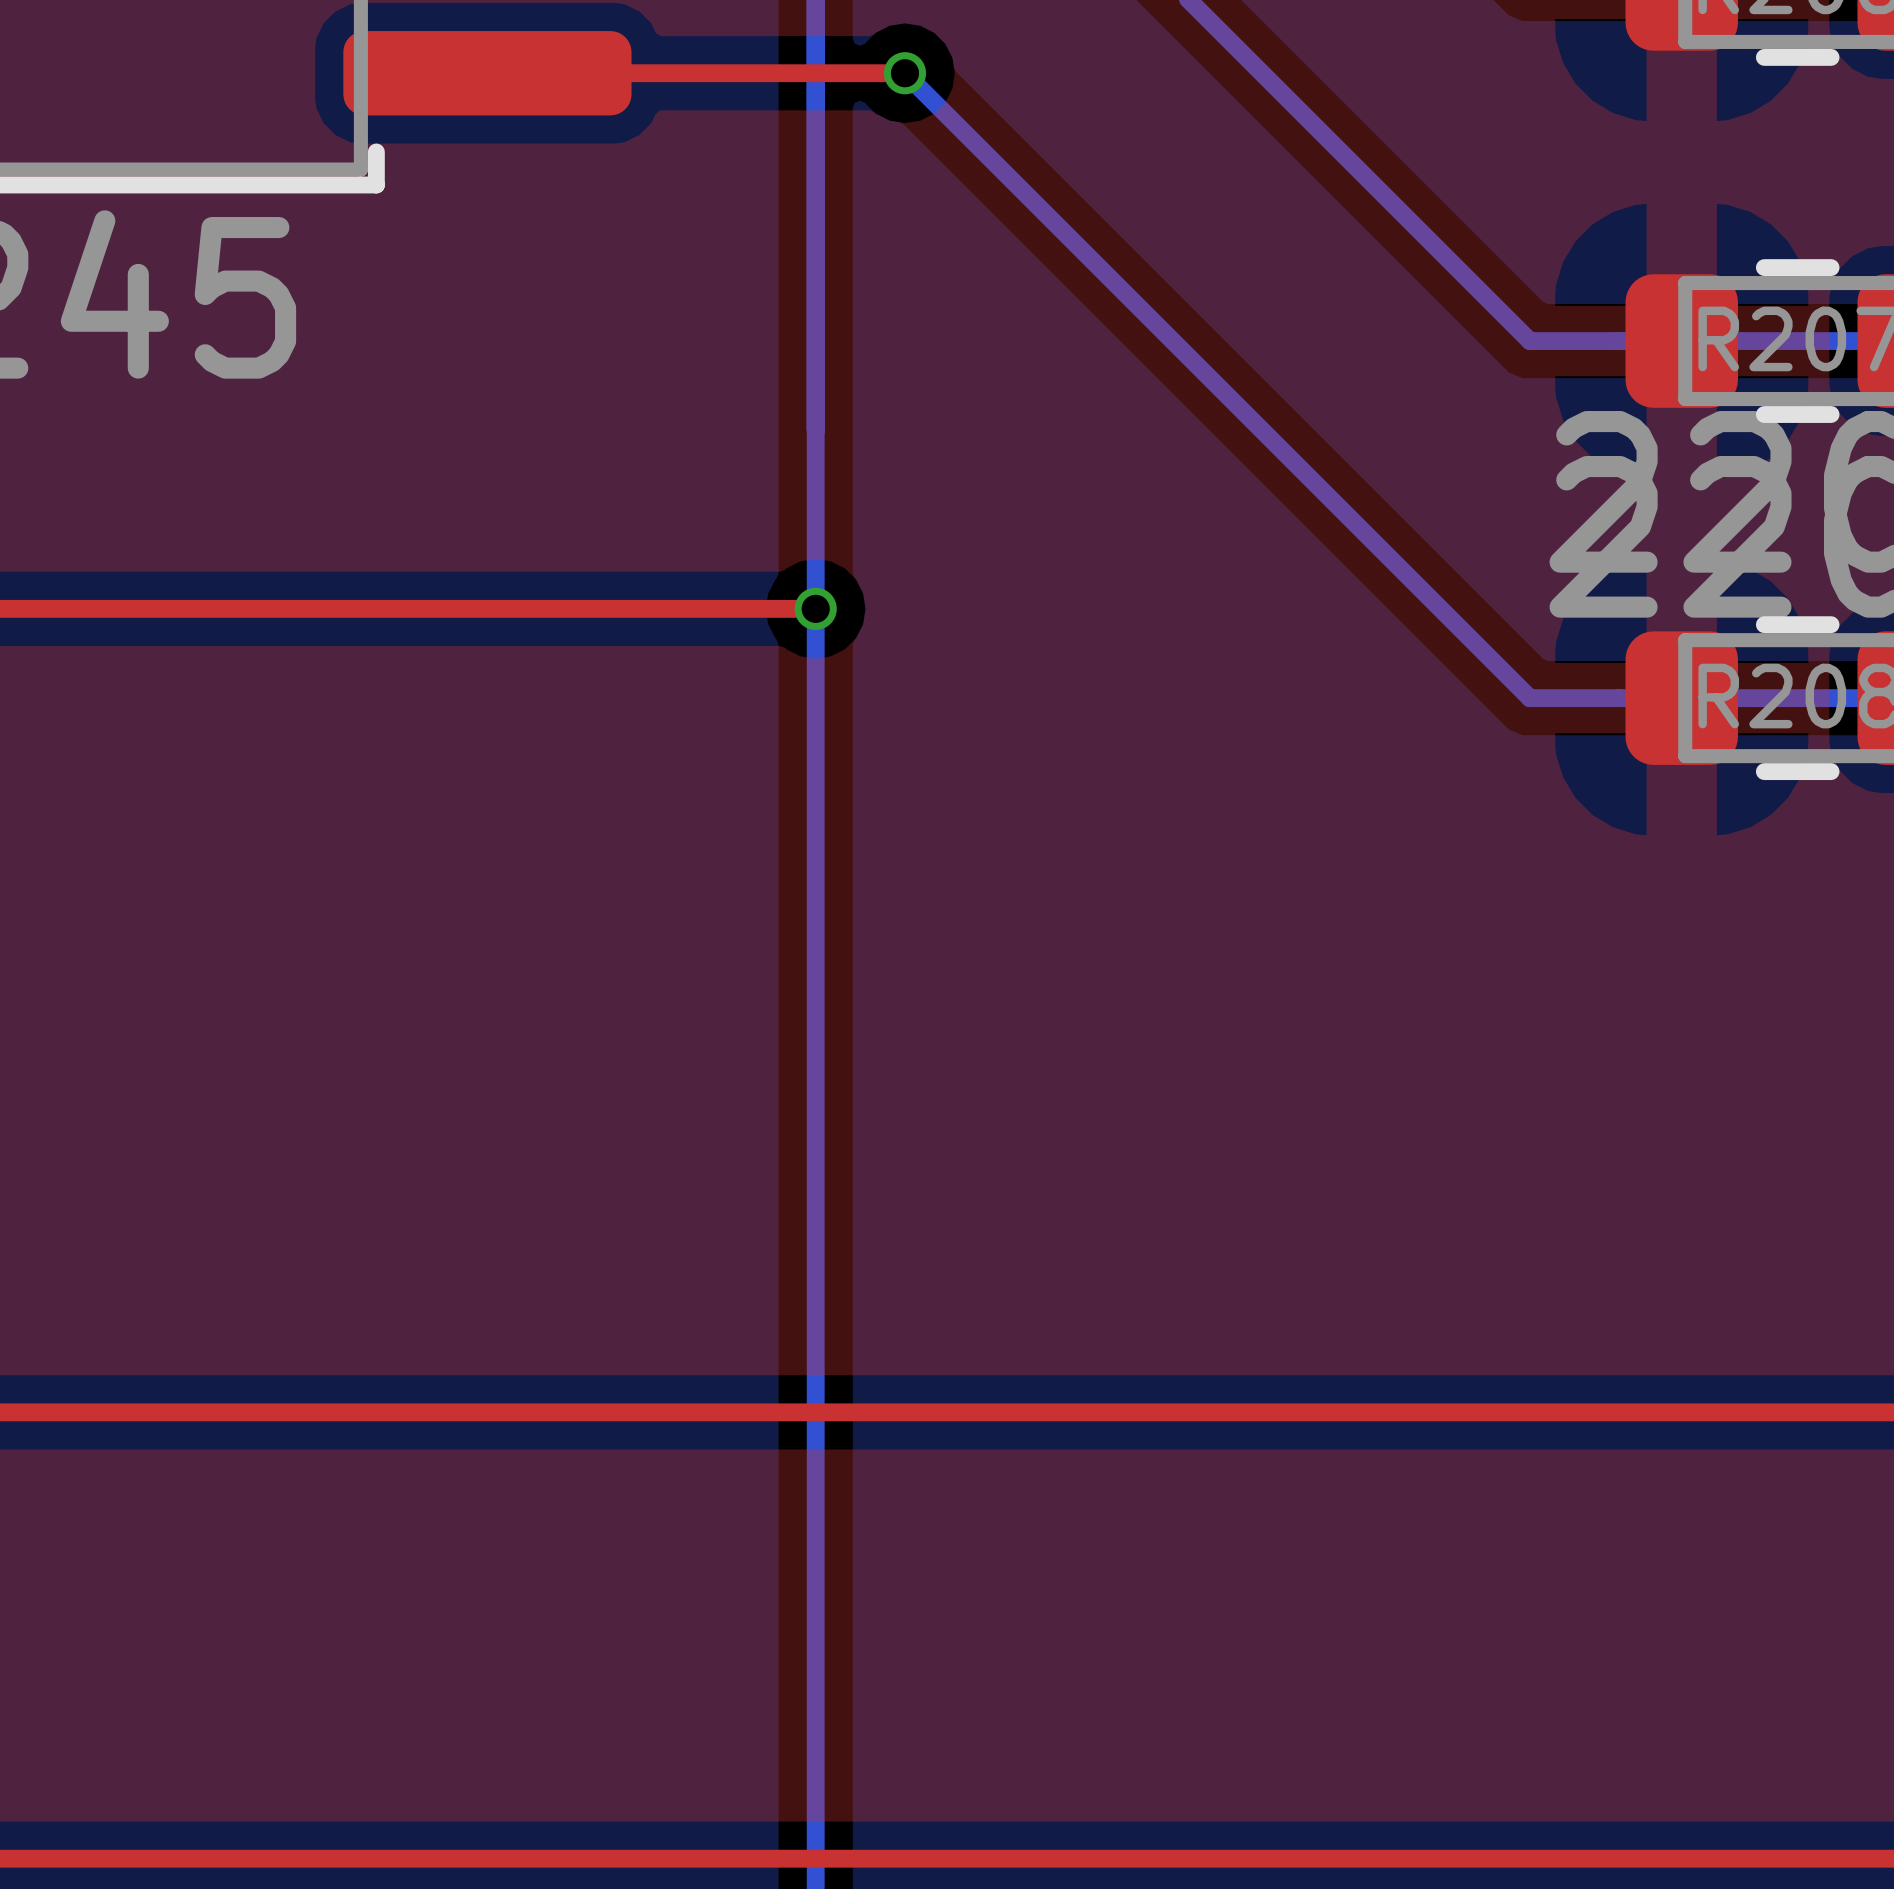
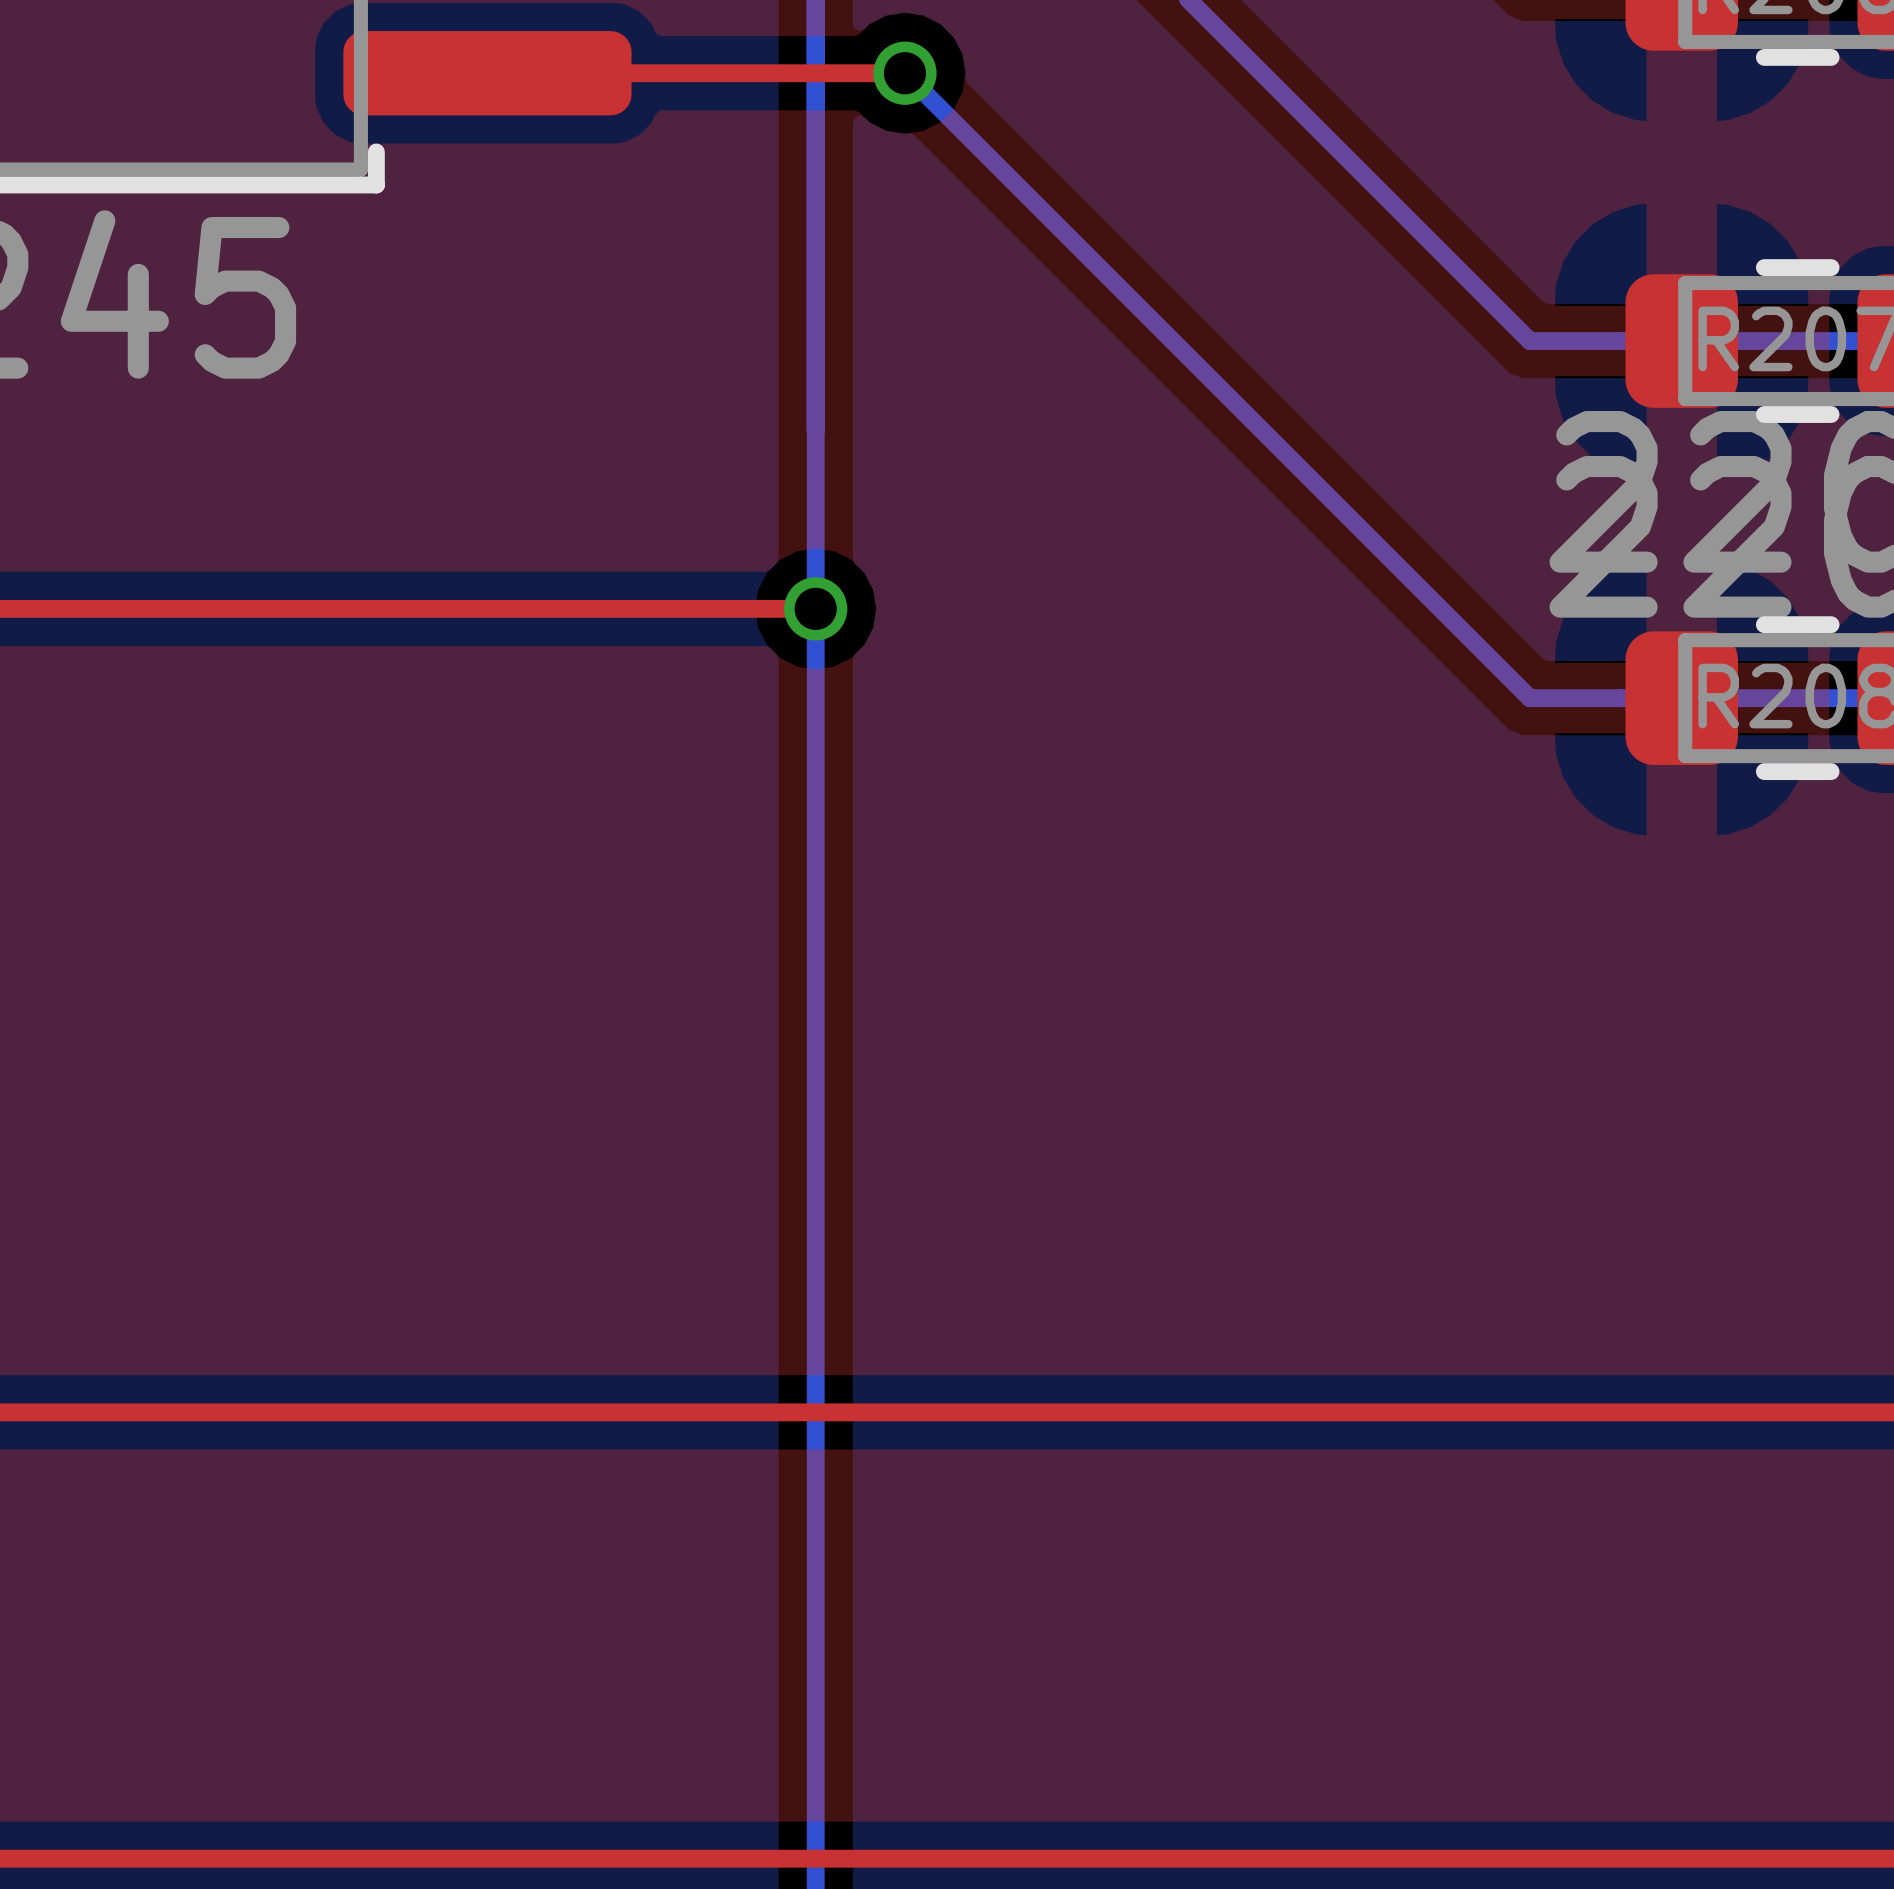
via size: [883, 52, 927, 95] -> [873, 41, 937, 105]
via size: [794, 587, 837, 630] -> [784, 577, 848, 641]

